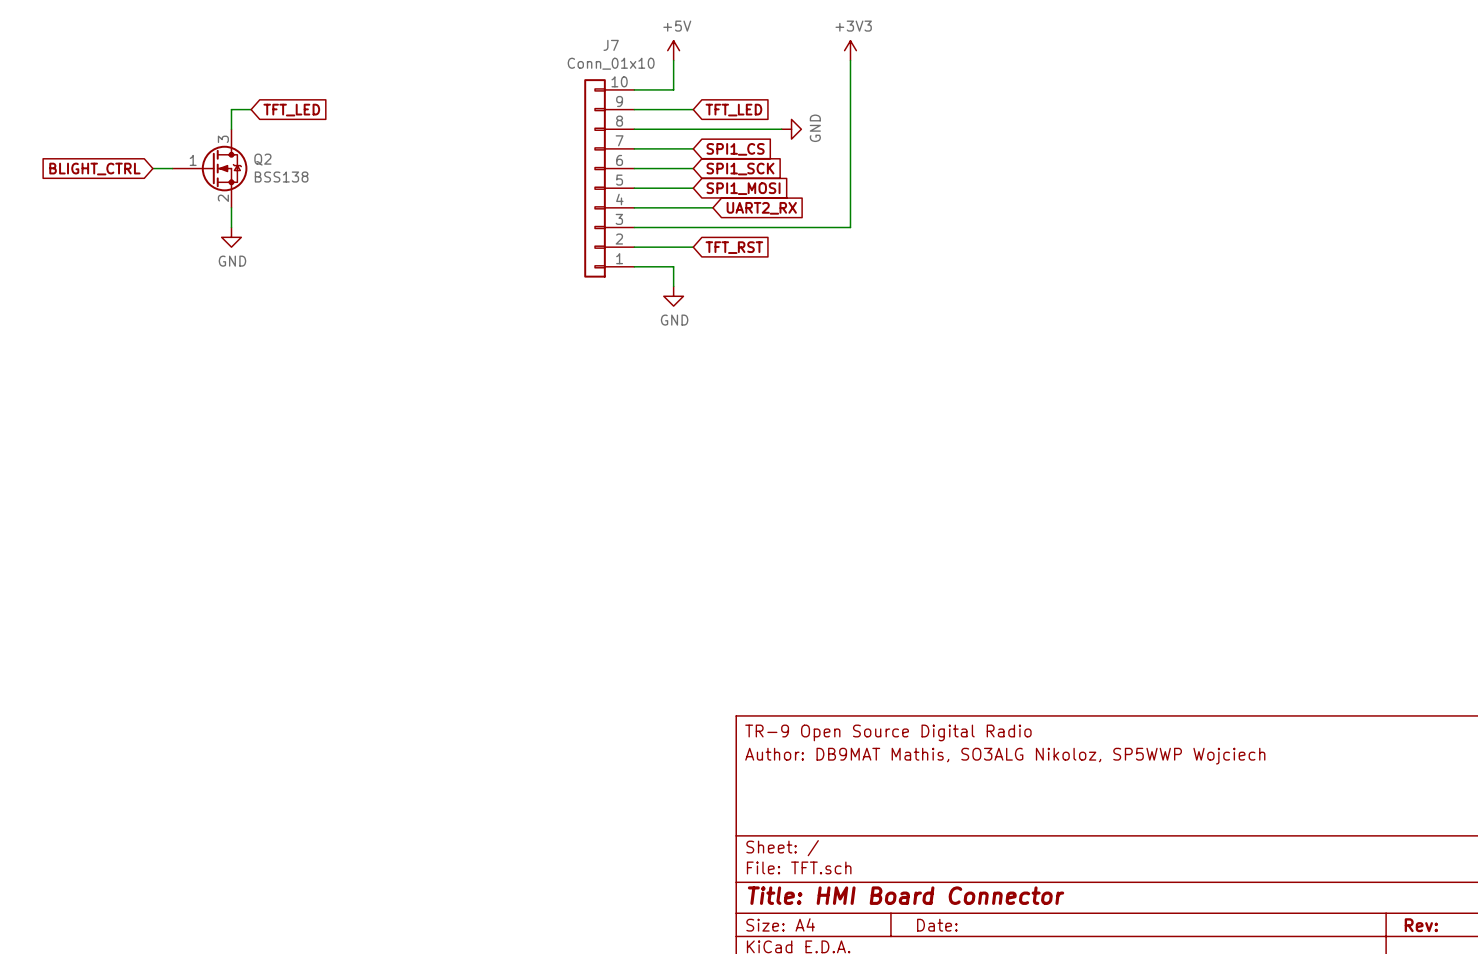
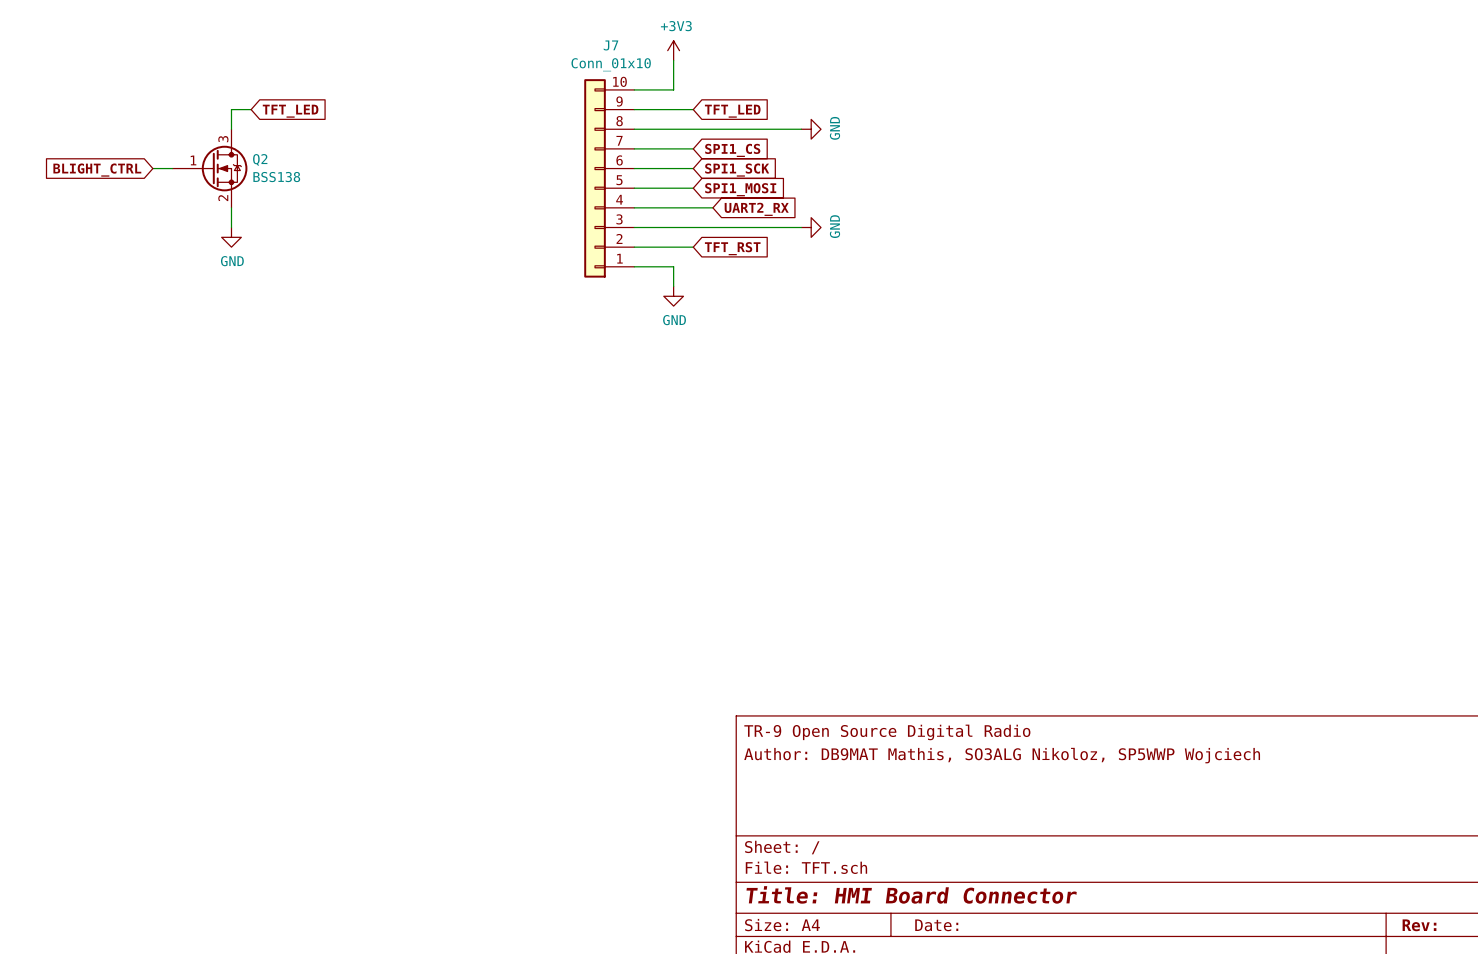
power symbol: +5V (673, 50) -> +3V3 (673, 50)
power symbol: +3V3 (850, 50) -> none
wire: (850, 60) (850, 227) (801, 227) -> none
power symbol position: GND (791, 129) -> GND (811, 129)
power symbol: none -> GND (811, 227)

